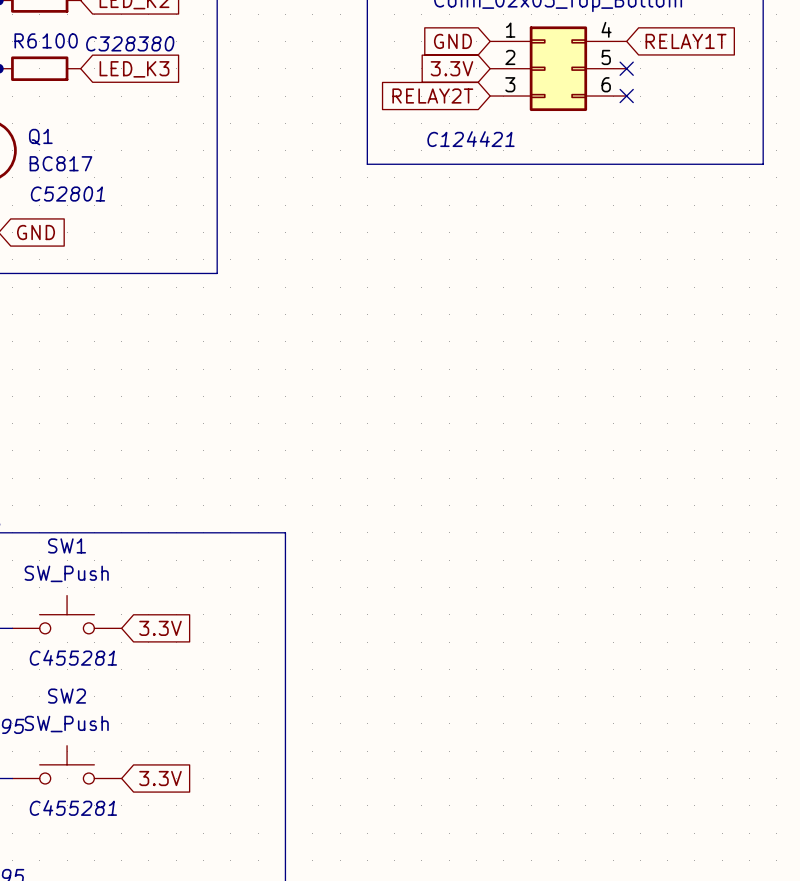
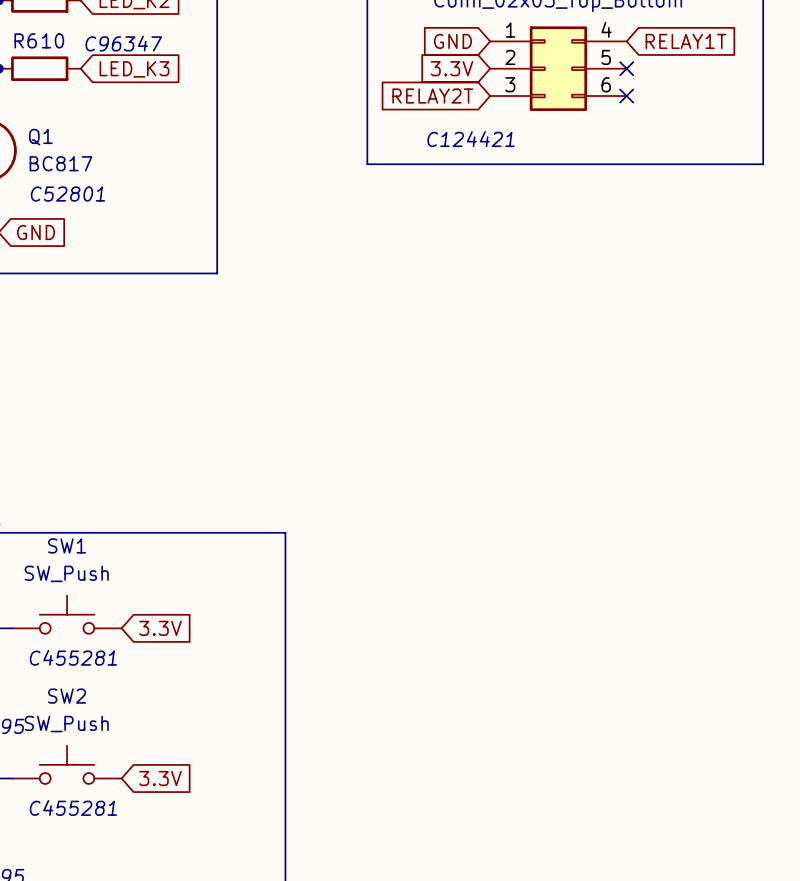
R6 value: 100 (60, 40) -> 10 (52, 40)
text: none -> C96347 (123, 43)
text: C328380 (130, 43) -> none

